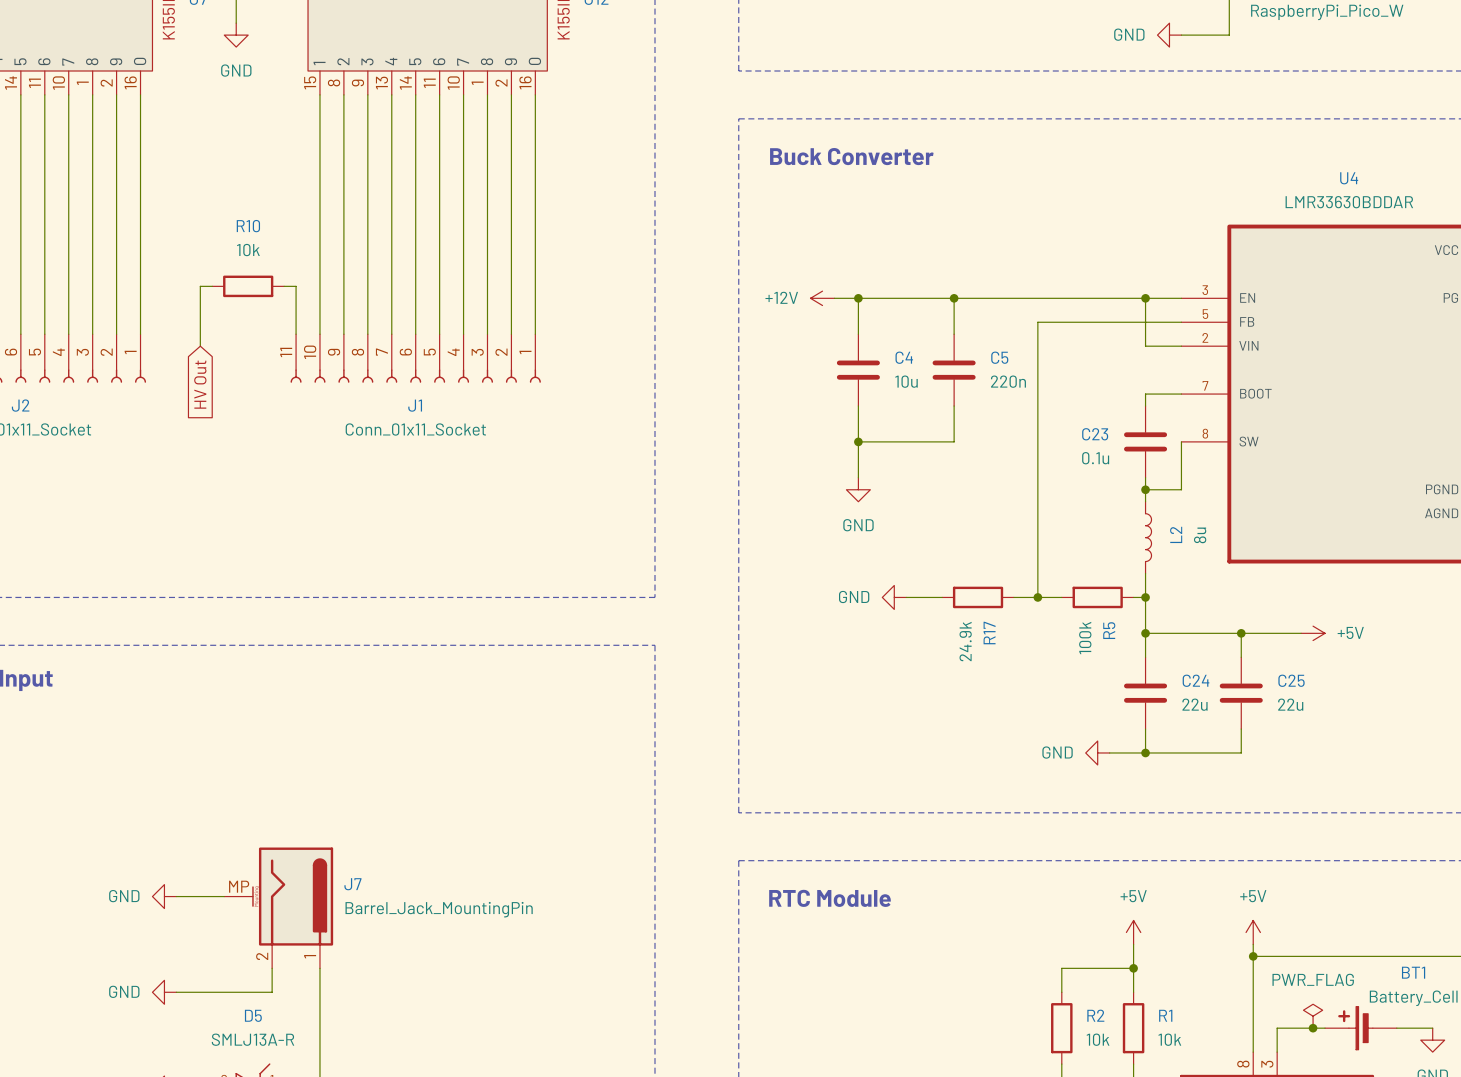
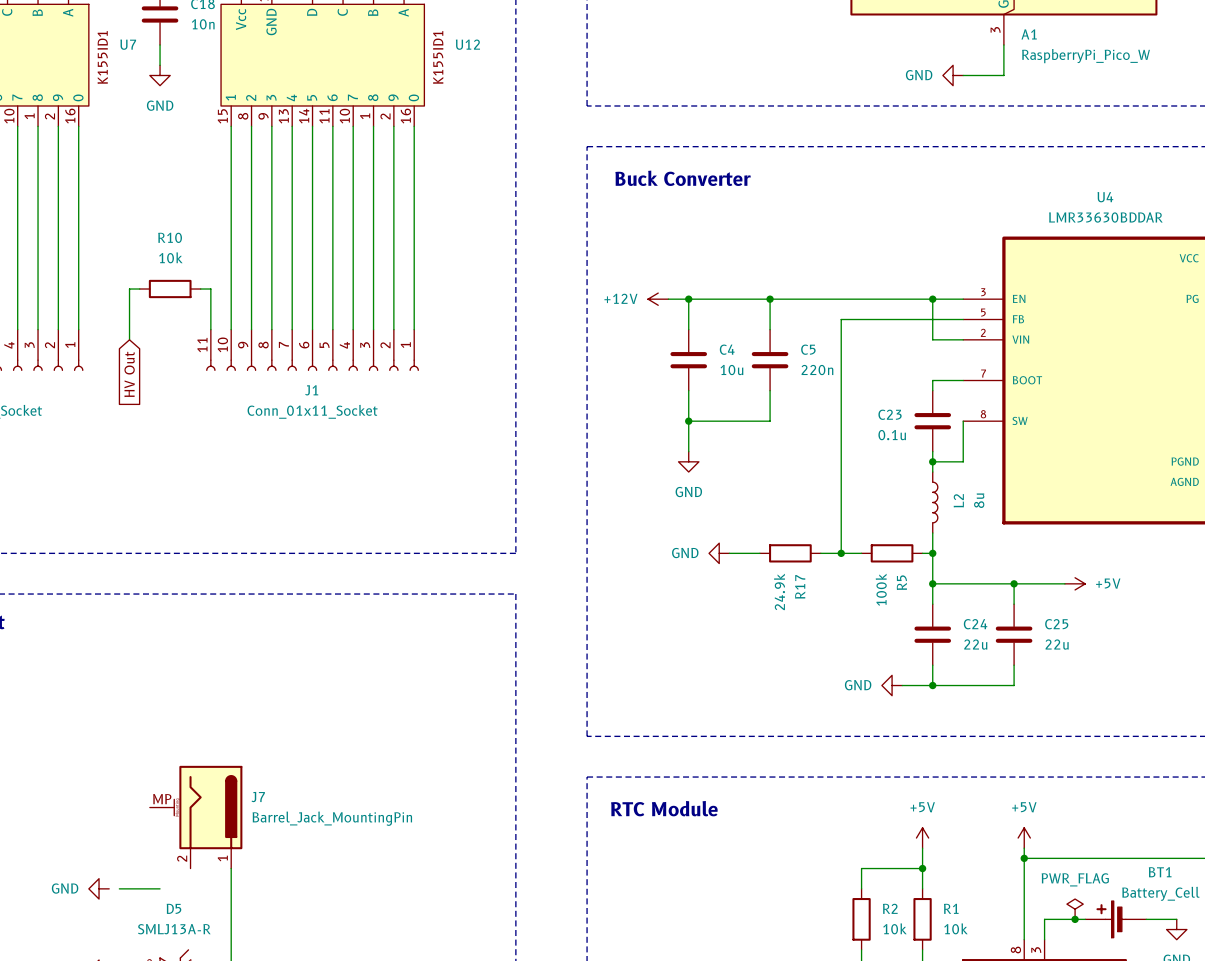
power symbol: GND (164, 896) -> none
wire: (176, 896) (224, 896) -> none
wire: (272, 968) (272, 992) (236, 992) -> none
wire: (176, 992) (188, 992) -> none

